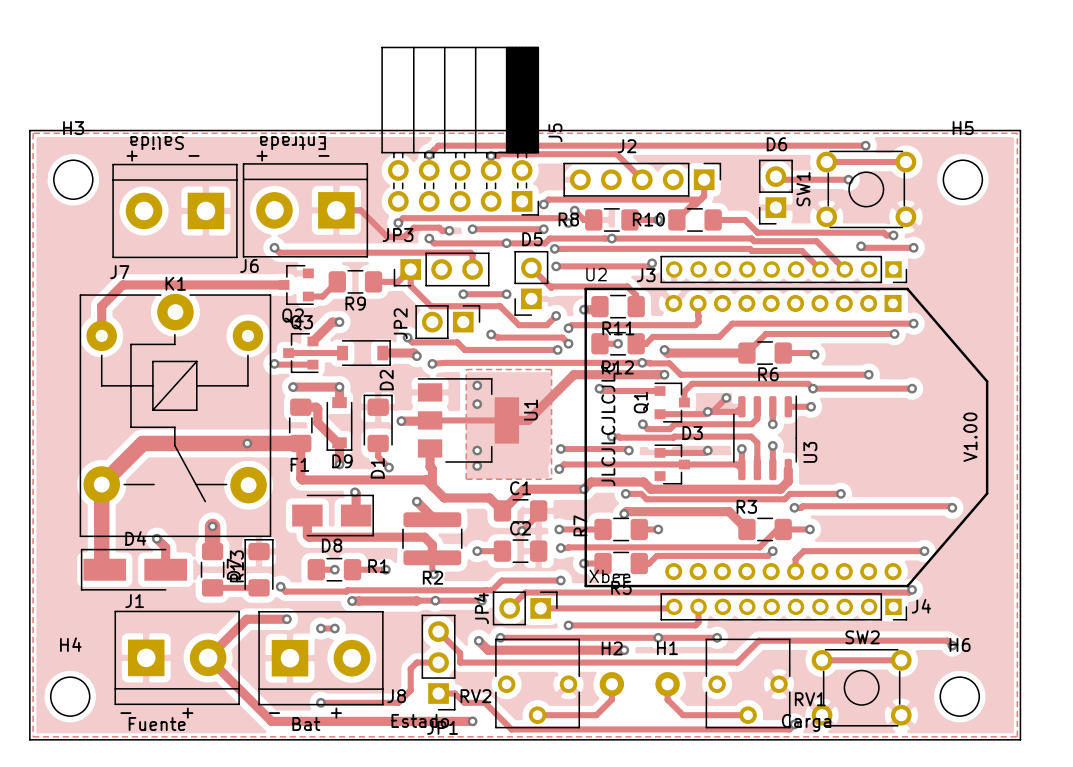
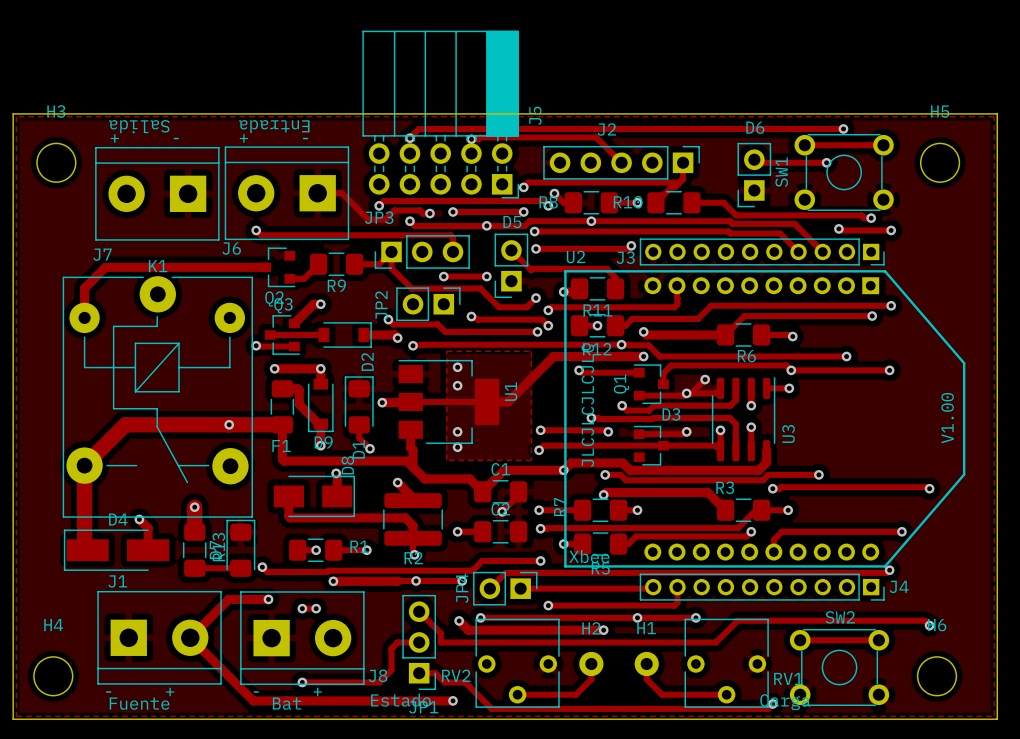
D8 name rotation: 0° (332, 545) -> 90° counterclockwise (347, 465)
D8 name position: D8 (332, 545) -> D8 (347, 465)

